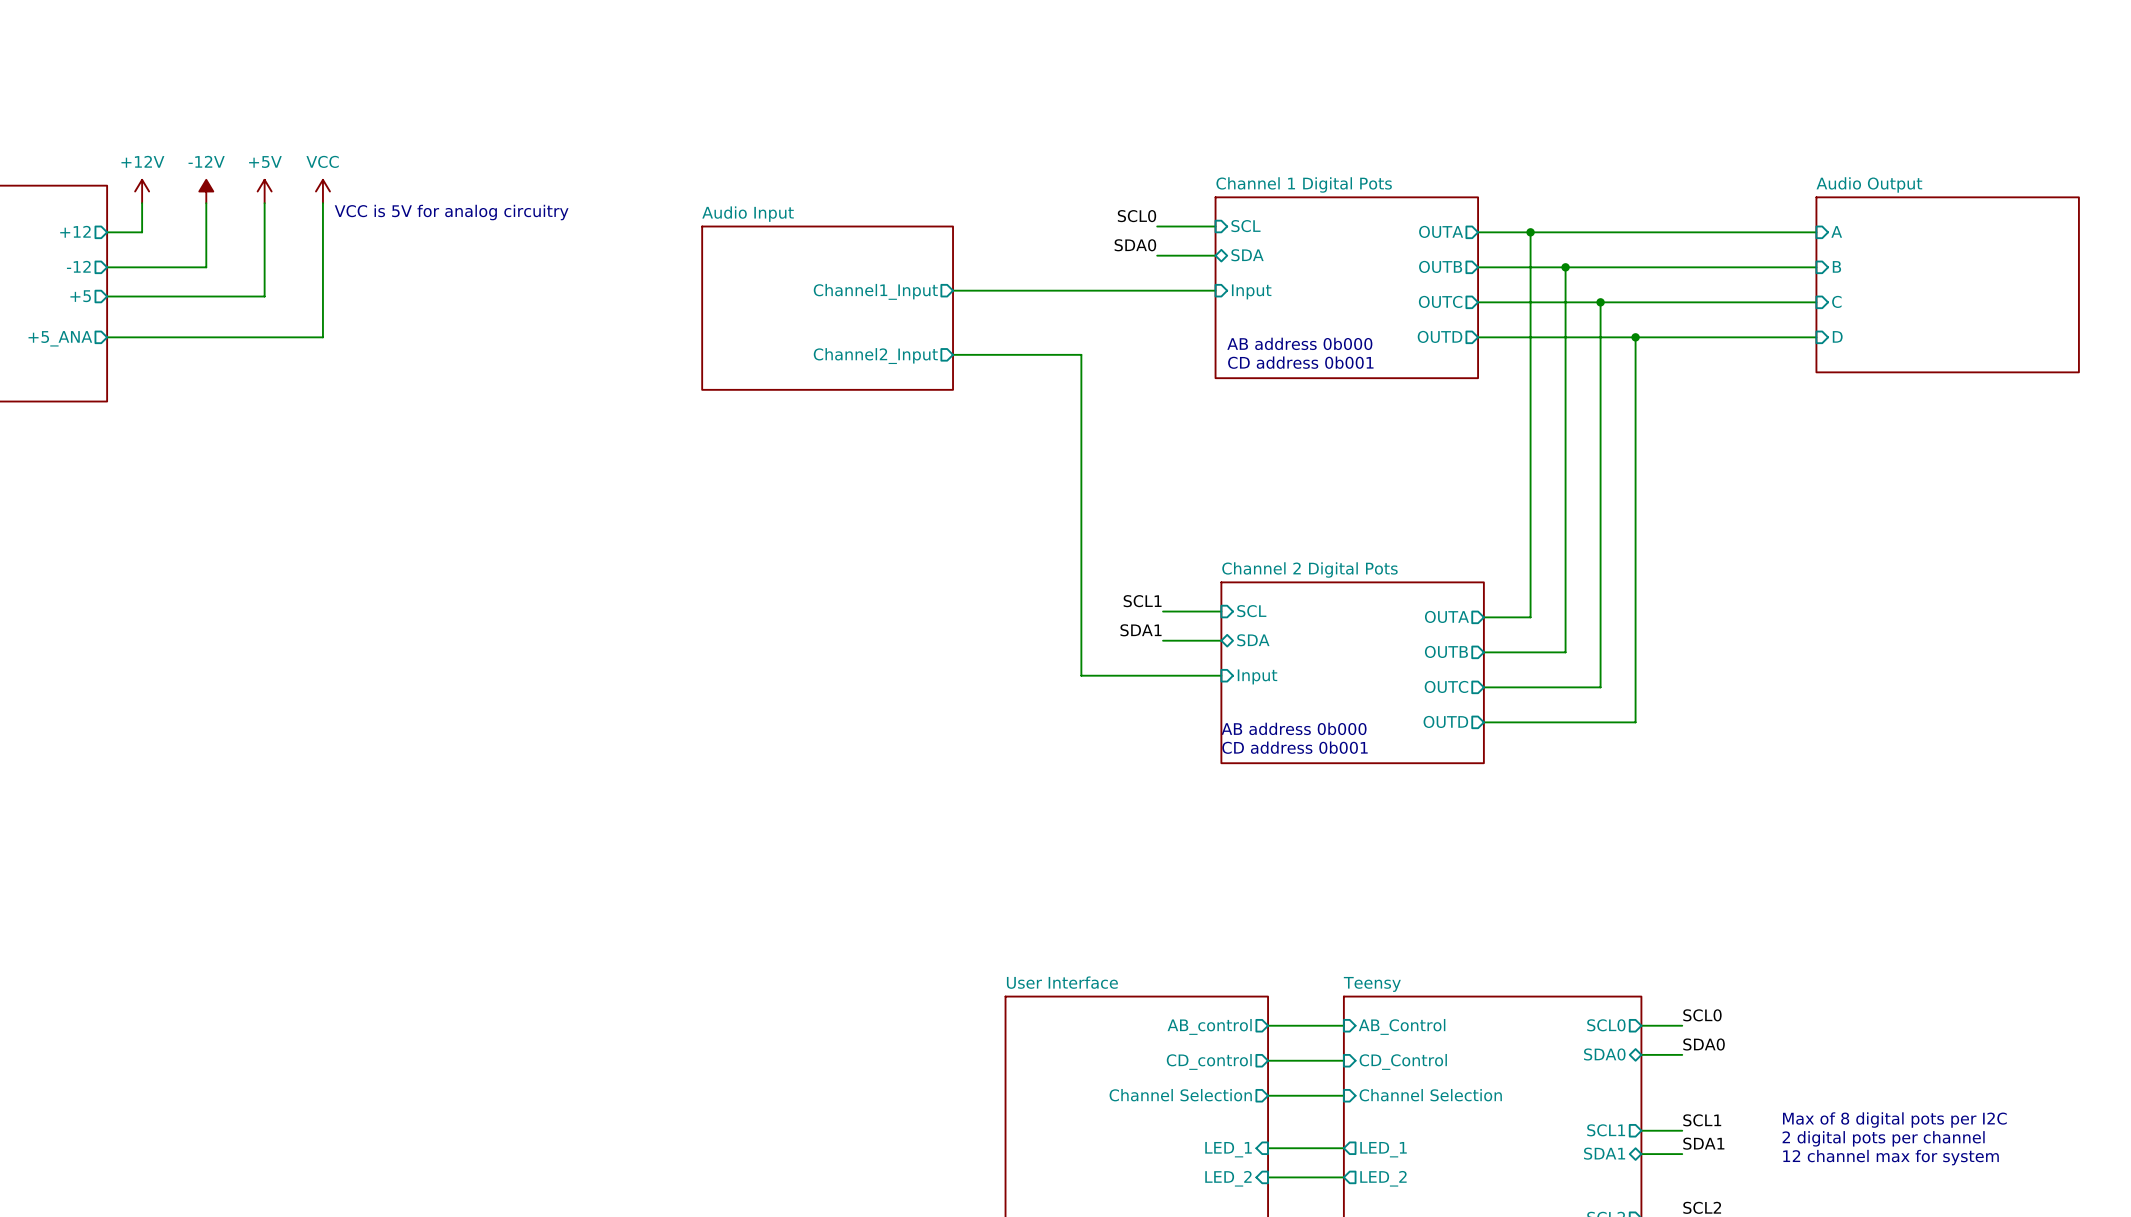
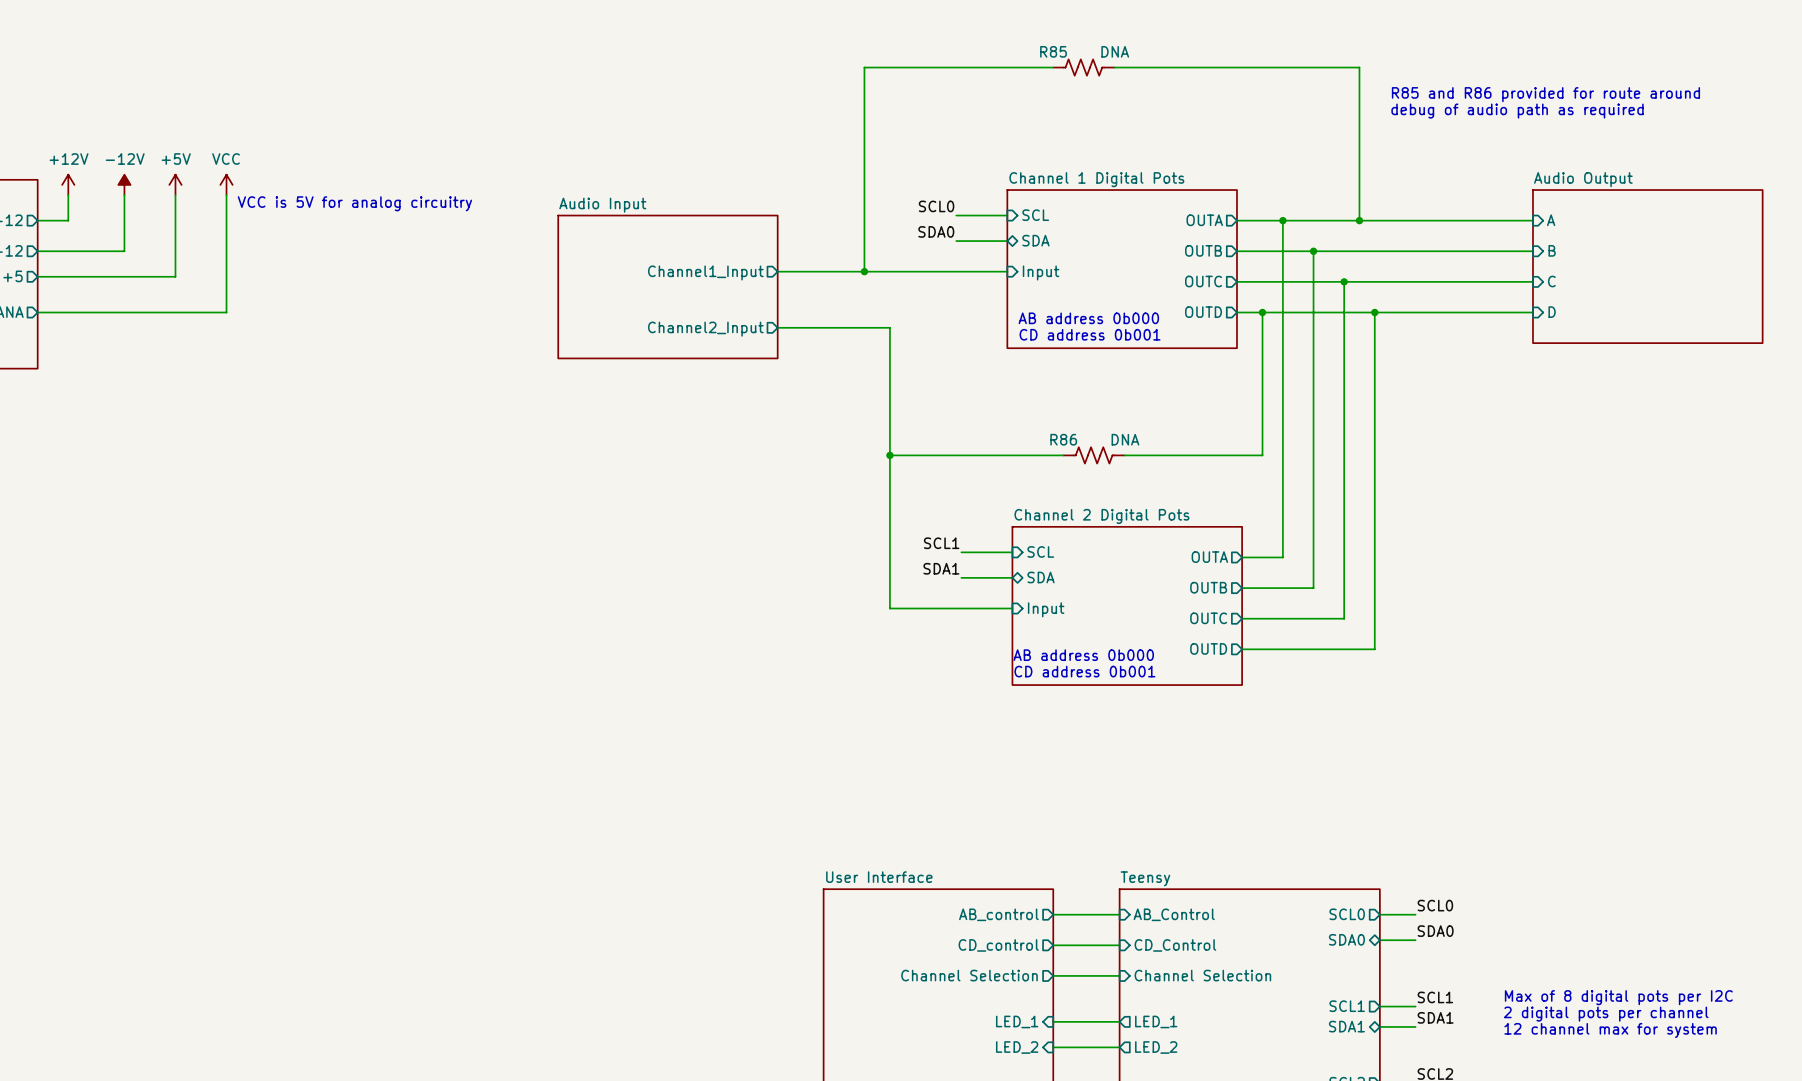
wire: none -> (1053, 67) (864, 67) (864, 271)
R85: none -> DNA (1083, 67)
wire: none -> (1114, 67) (1359, 67) (1359, 220)
text: none -> R85 and R86 provided for route around (1545, 94)
text: none -> debug of audio path as required (1517, 111)
junction: none -> (1359, 220)
junction: none -> (864, 271)
wire: none -> (1262, 312) (1262, 455) (1124, 455)
junction: none -> (1262, 312)
wire: none -> (889, 455) (1063, 455)
junction: none -> (889, 455)
R86: none -> DNA (1094, 455)

